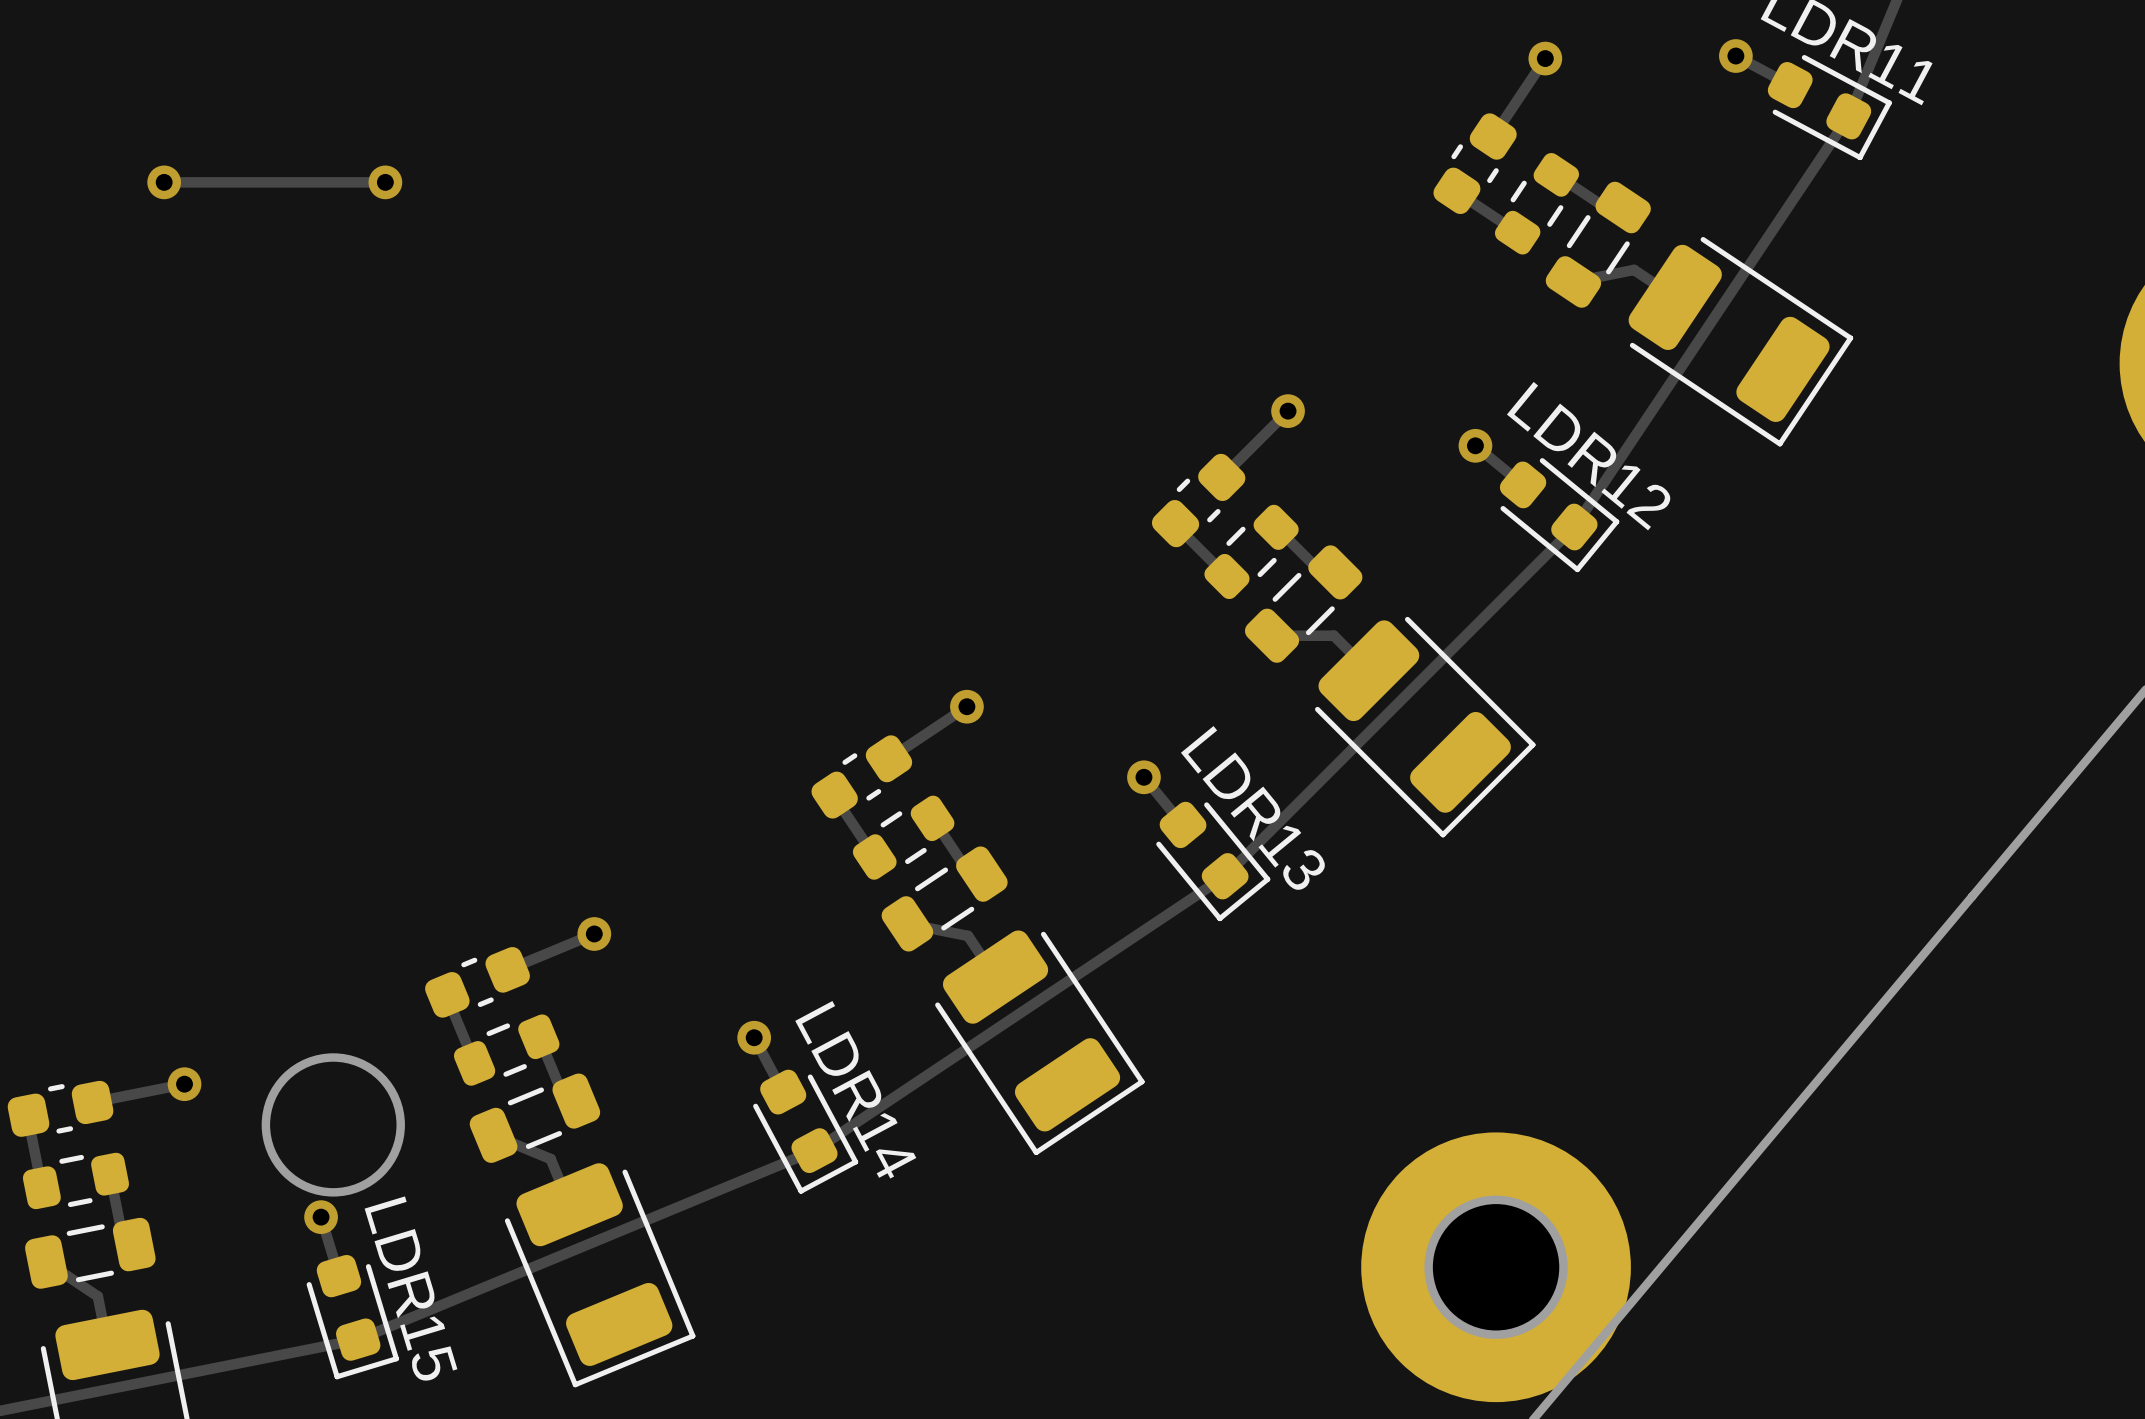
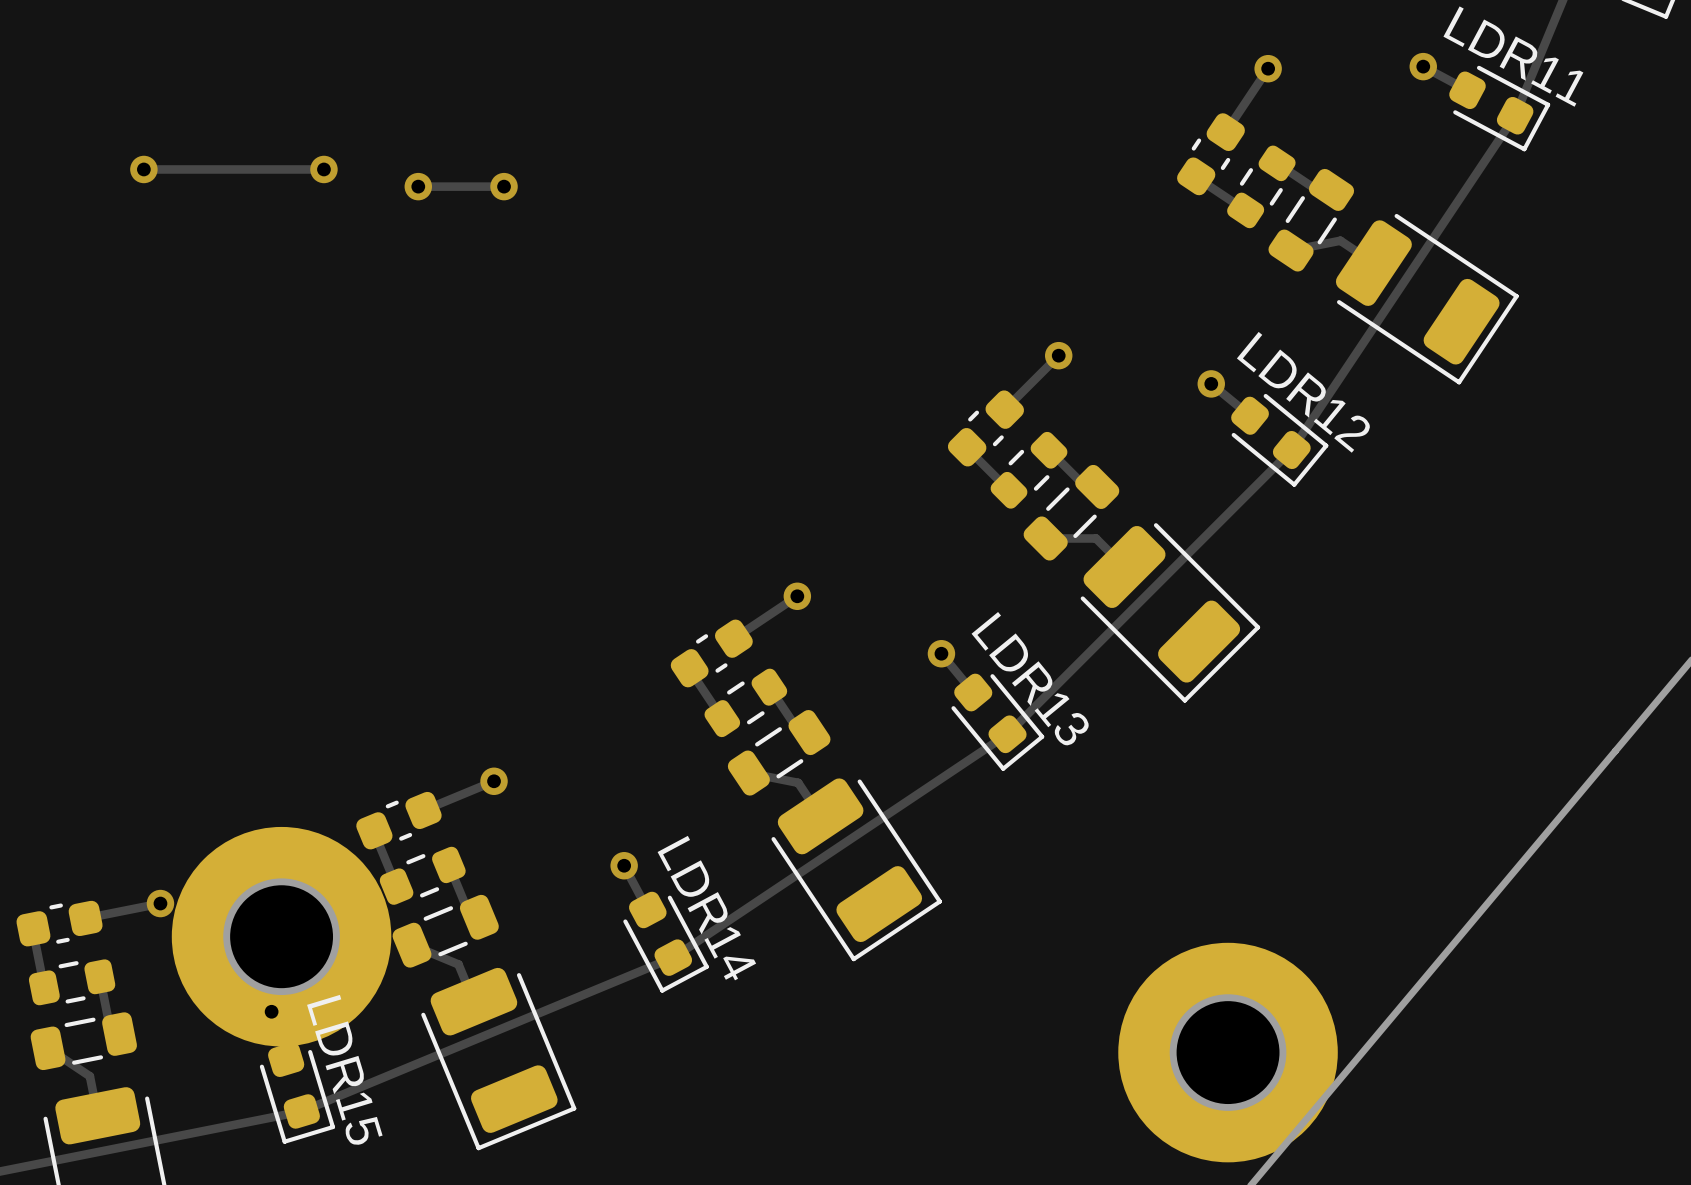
via: none -> (418, 186)
track: none -> (504, 186) (418, 186)
via: none -> (504, 186)
part: none -> (281, 936)

